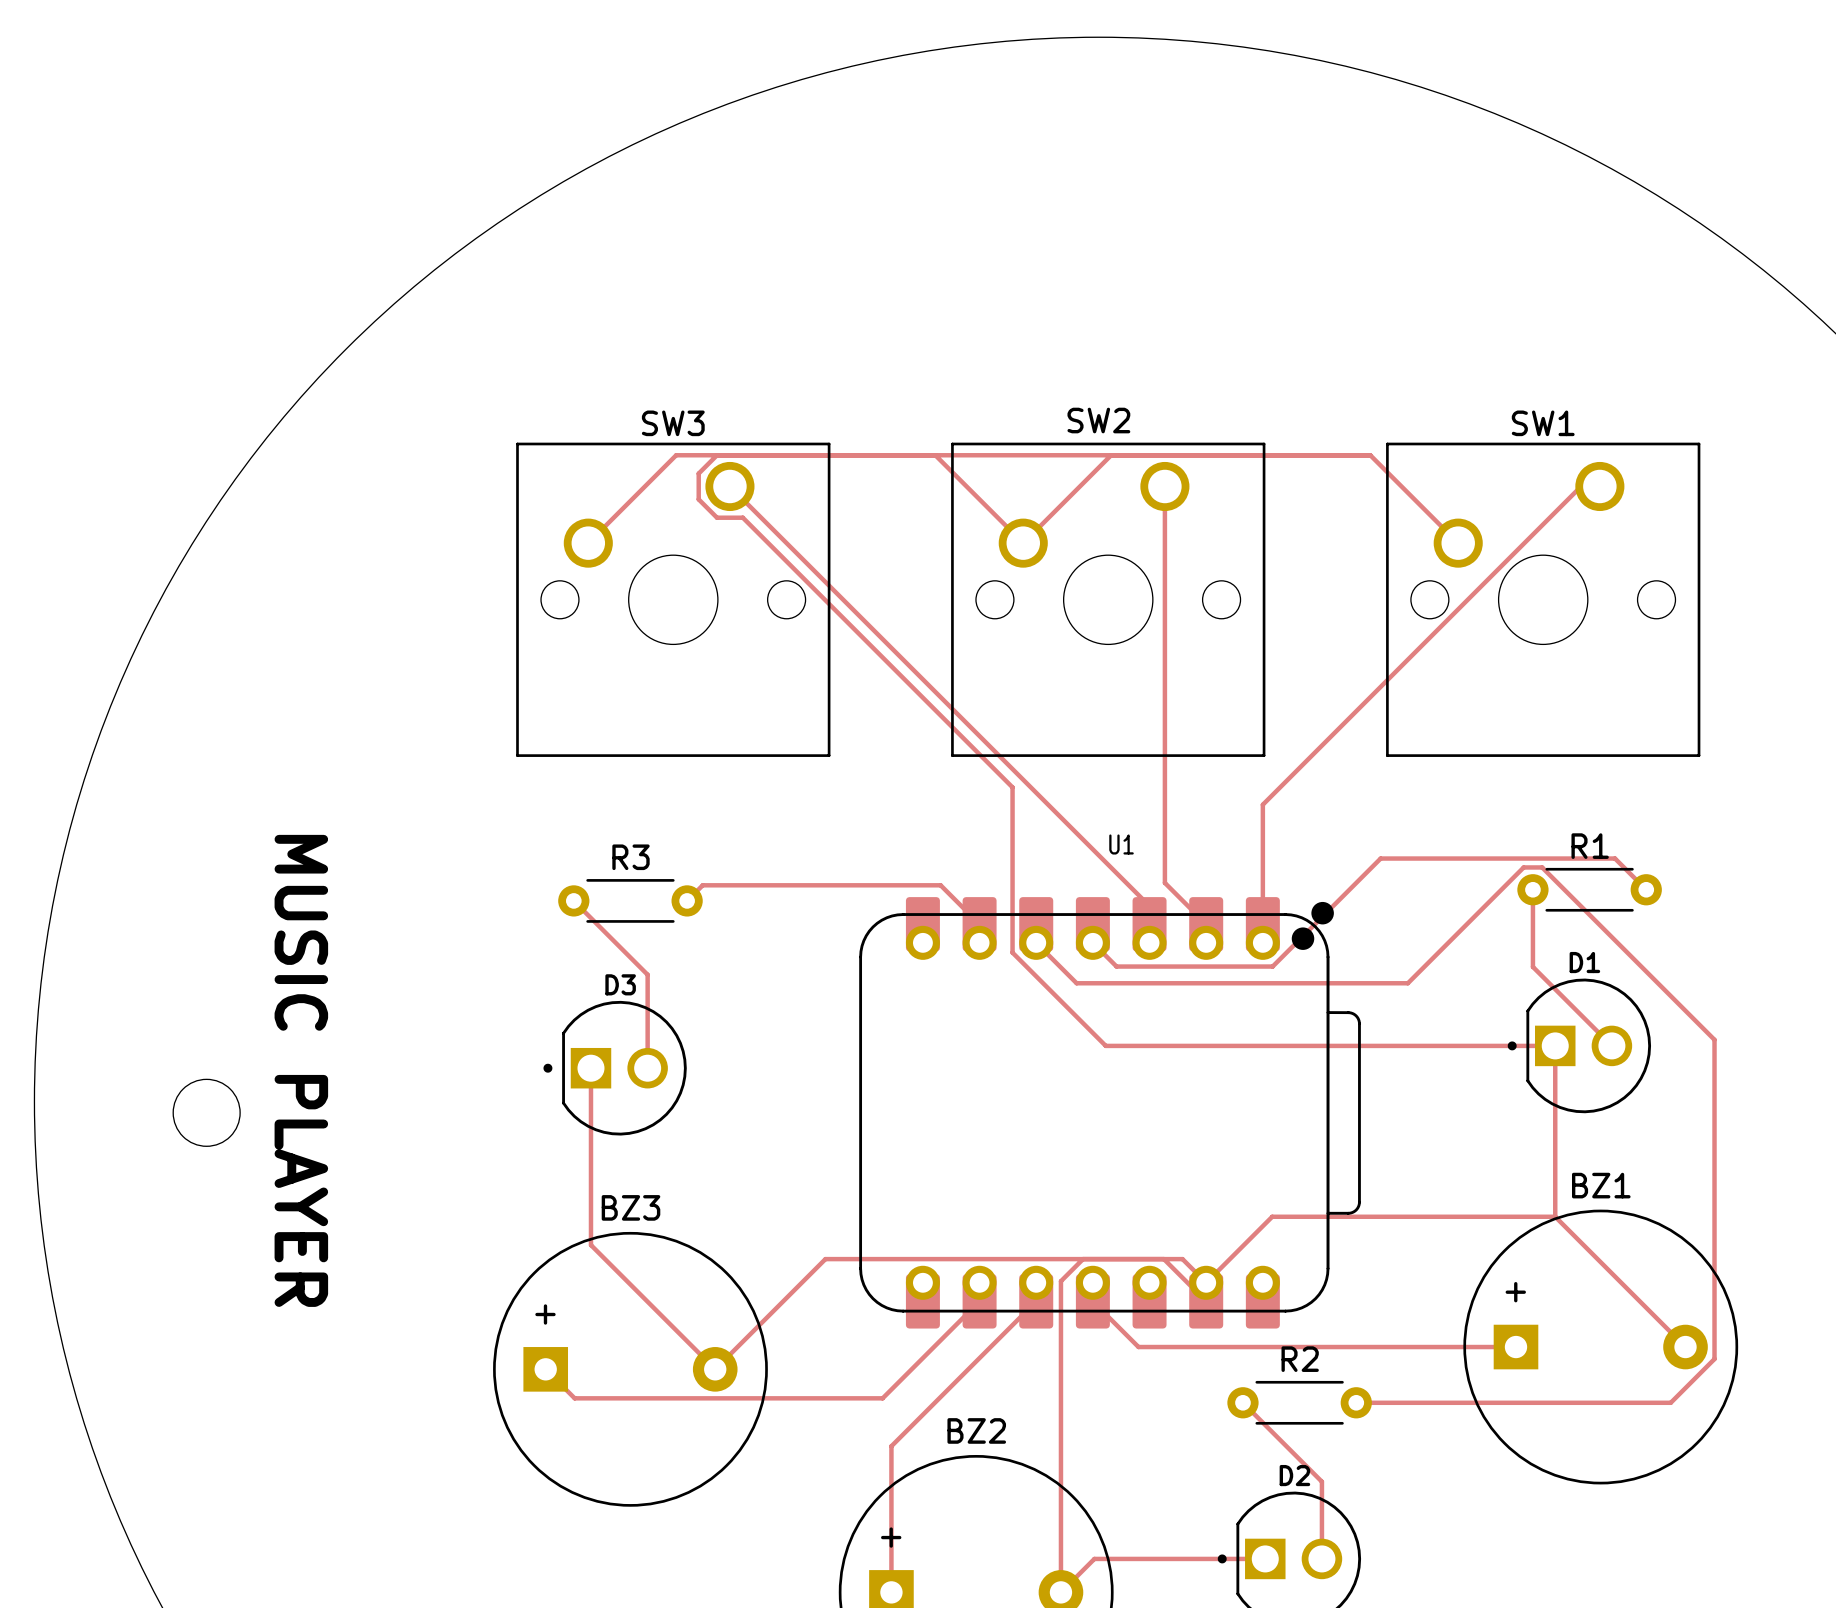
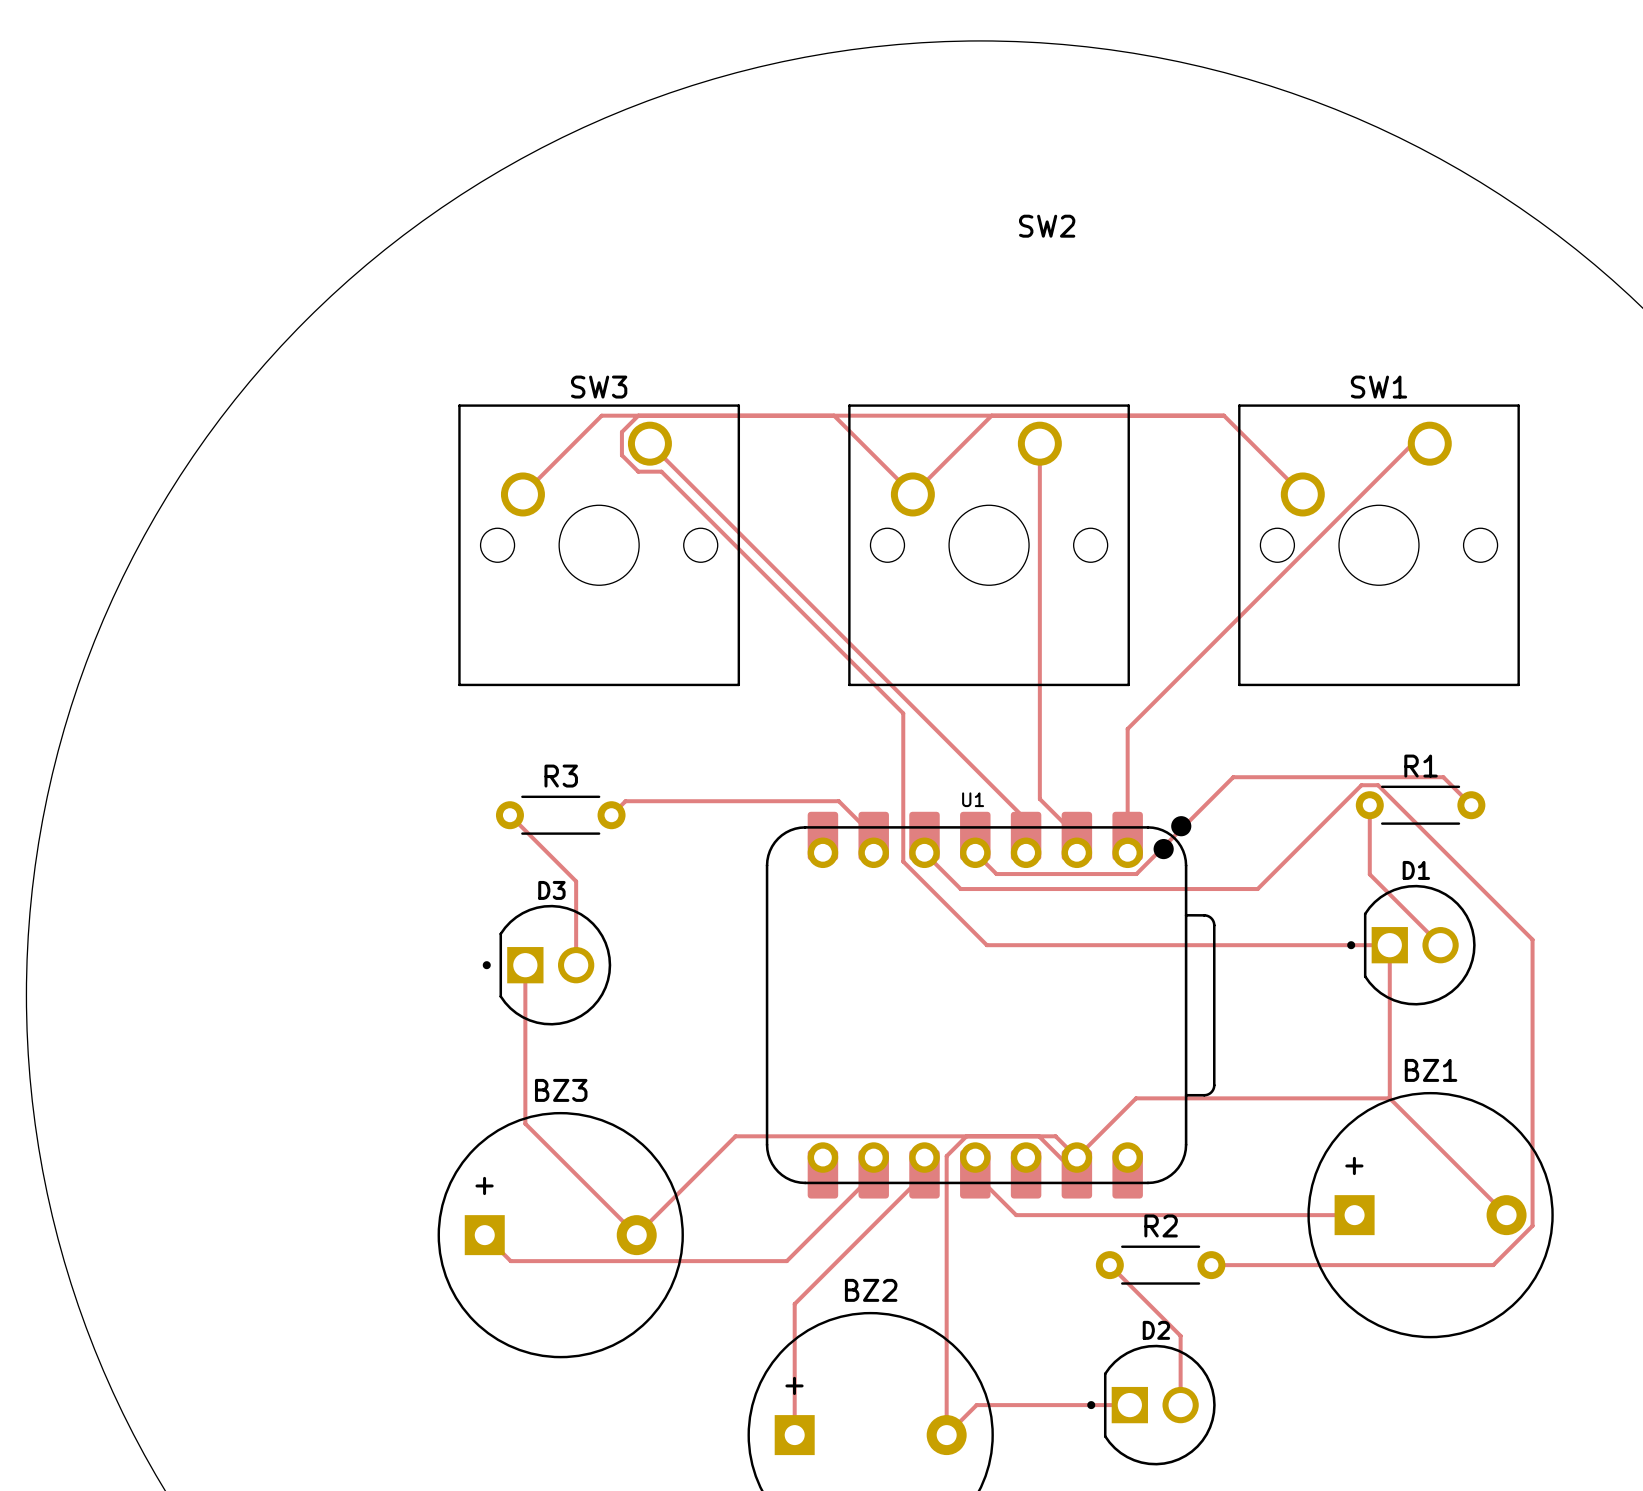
SW2 name position: SW2 (1098, 420) -> SW2 (1047, 226)
U1 name position: U1 (1121, 844) -> U1 (973, 799)
text: MUSIC PLAYER (301, 1070) -> none
round board edge: [172, 1078, 241, 1147] -> none

